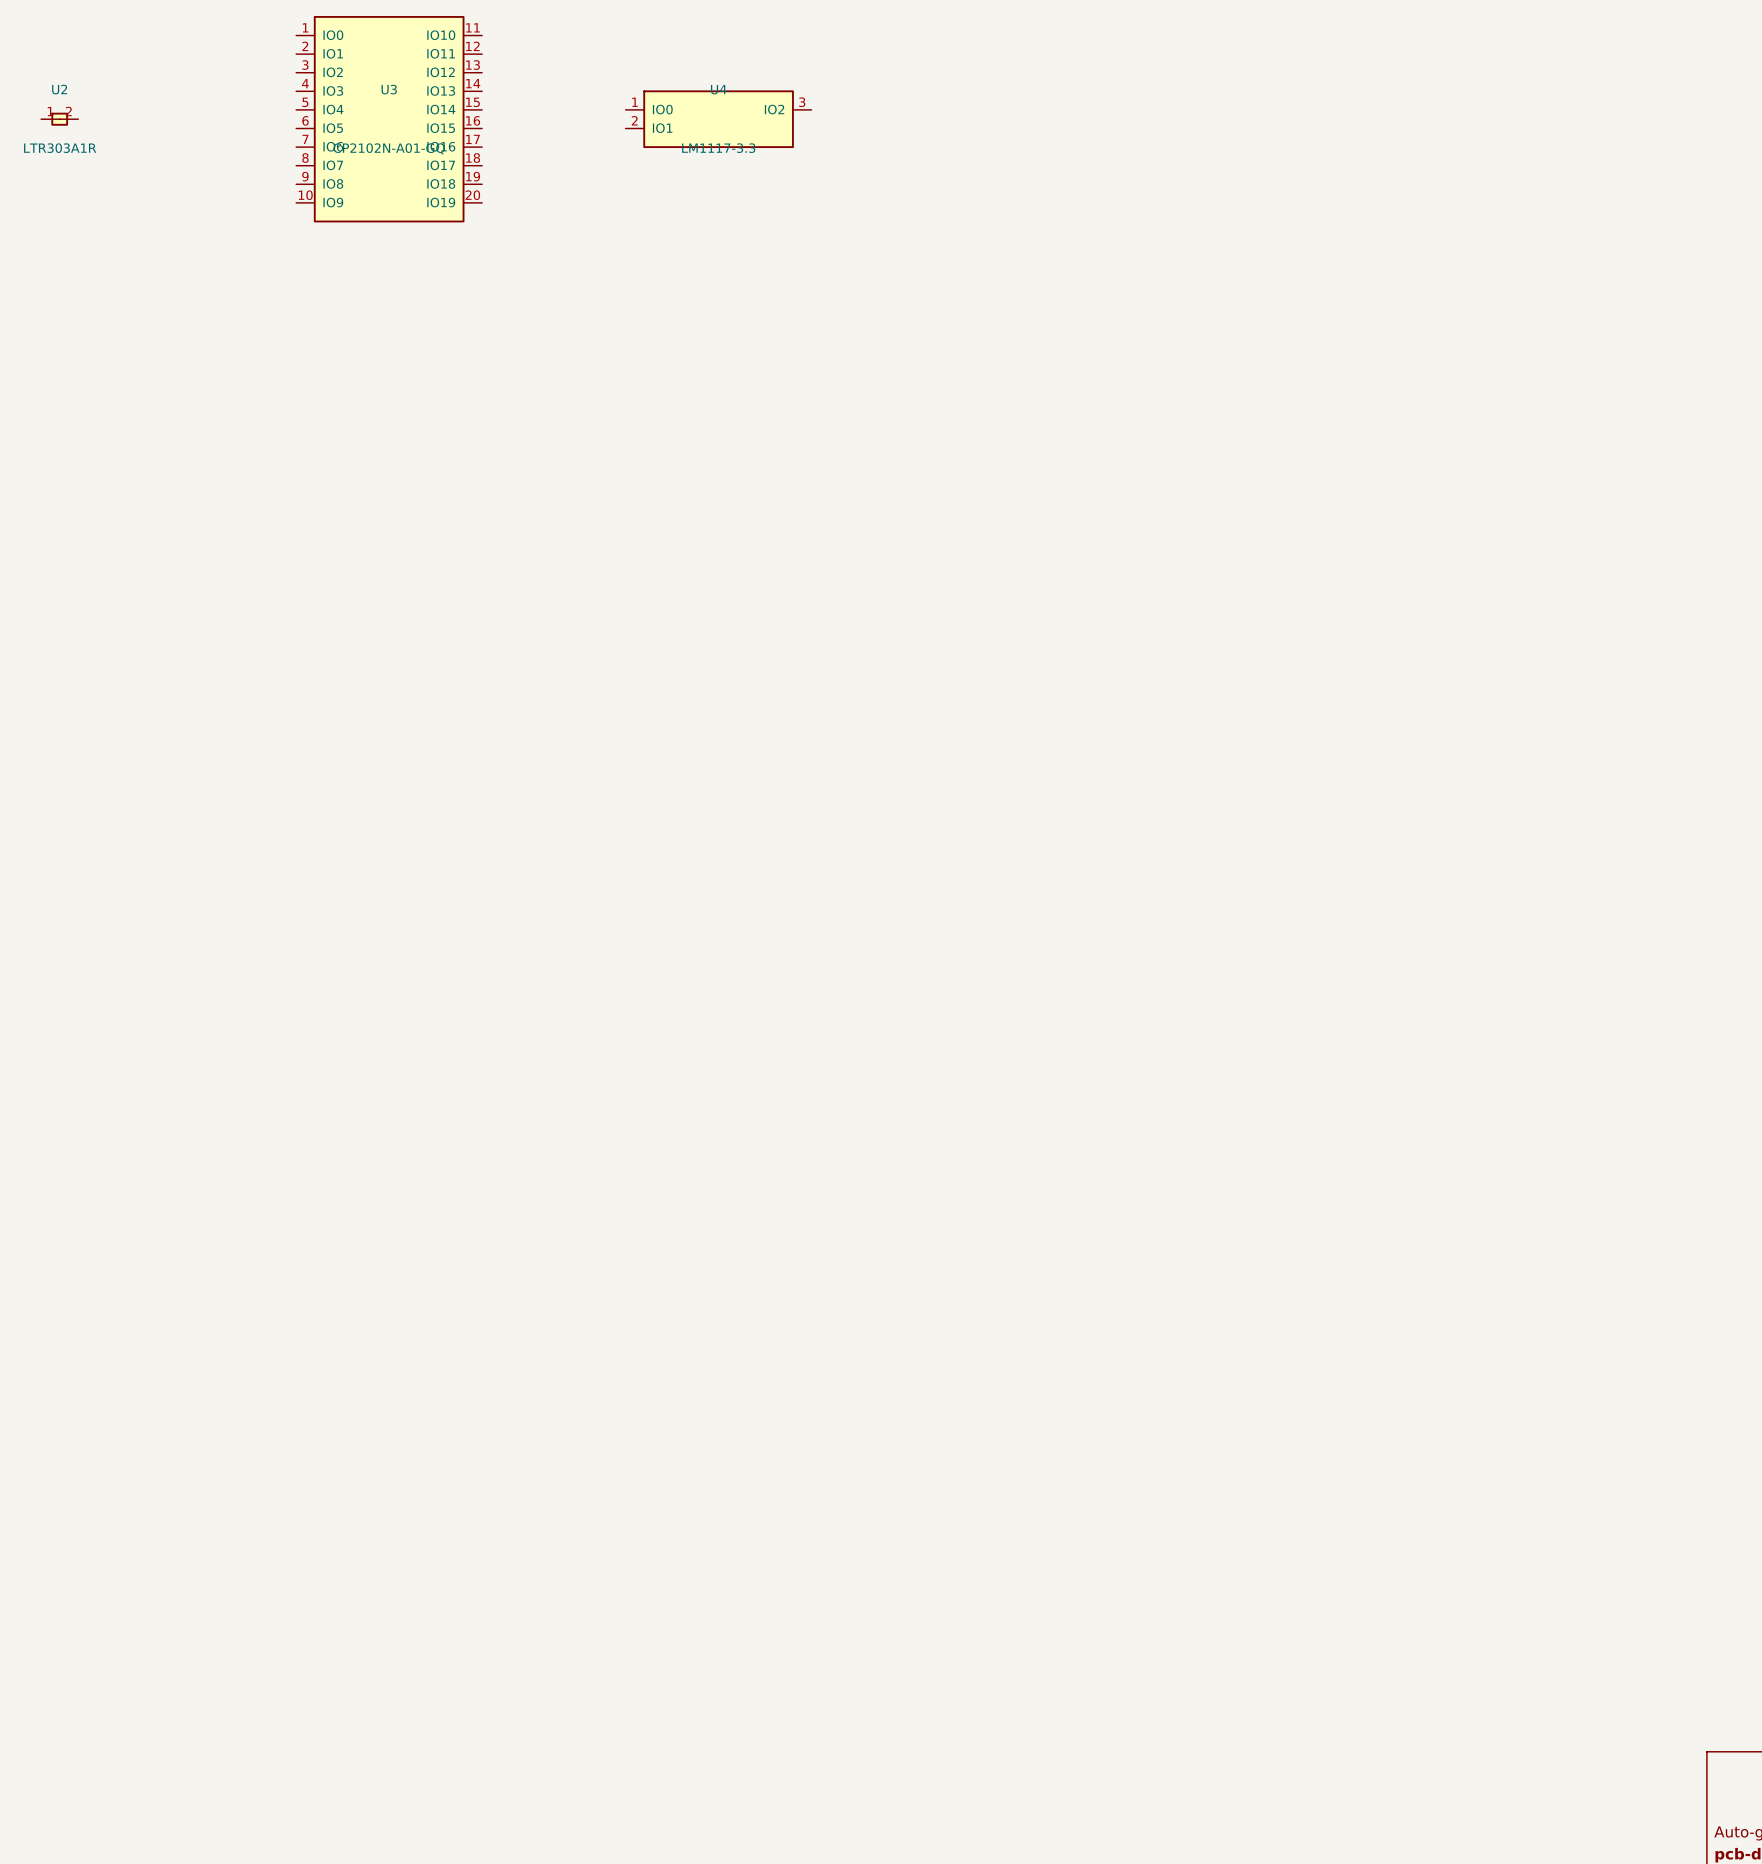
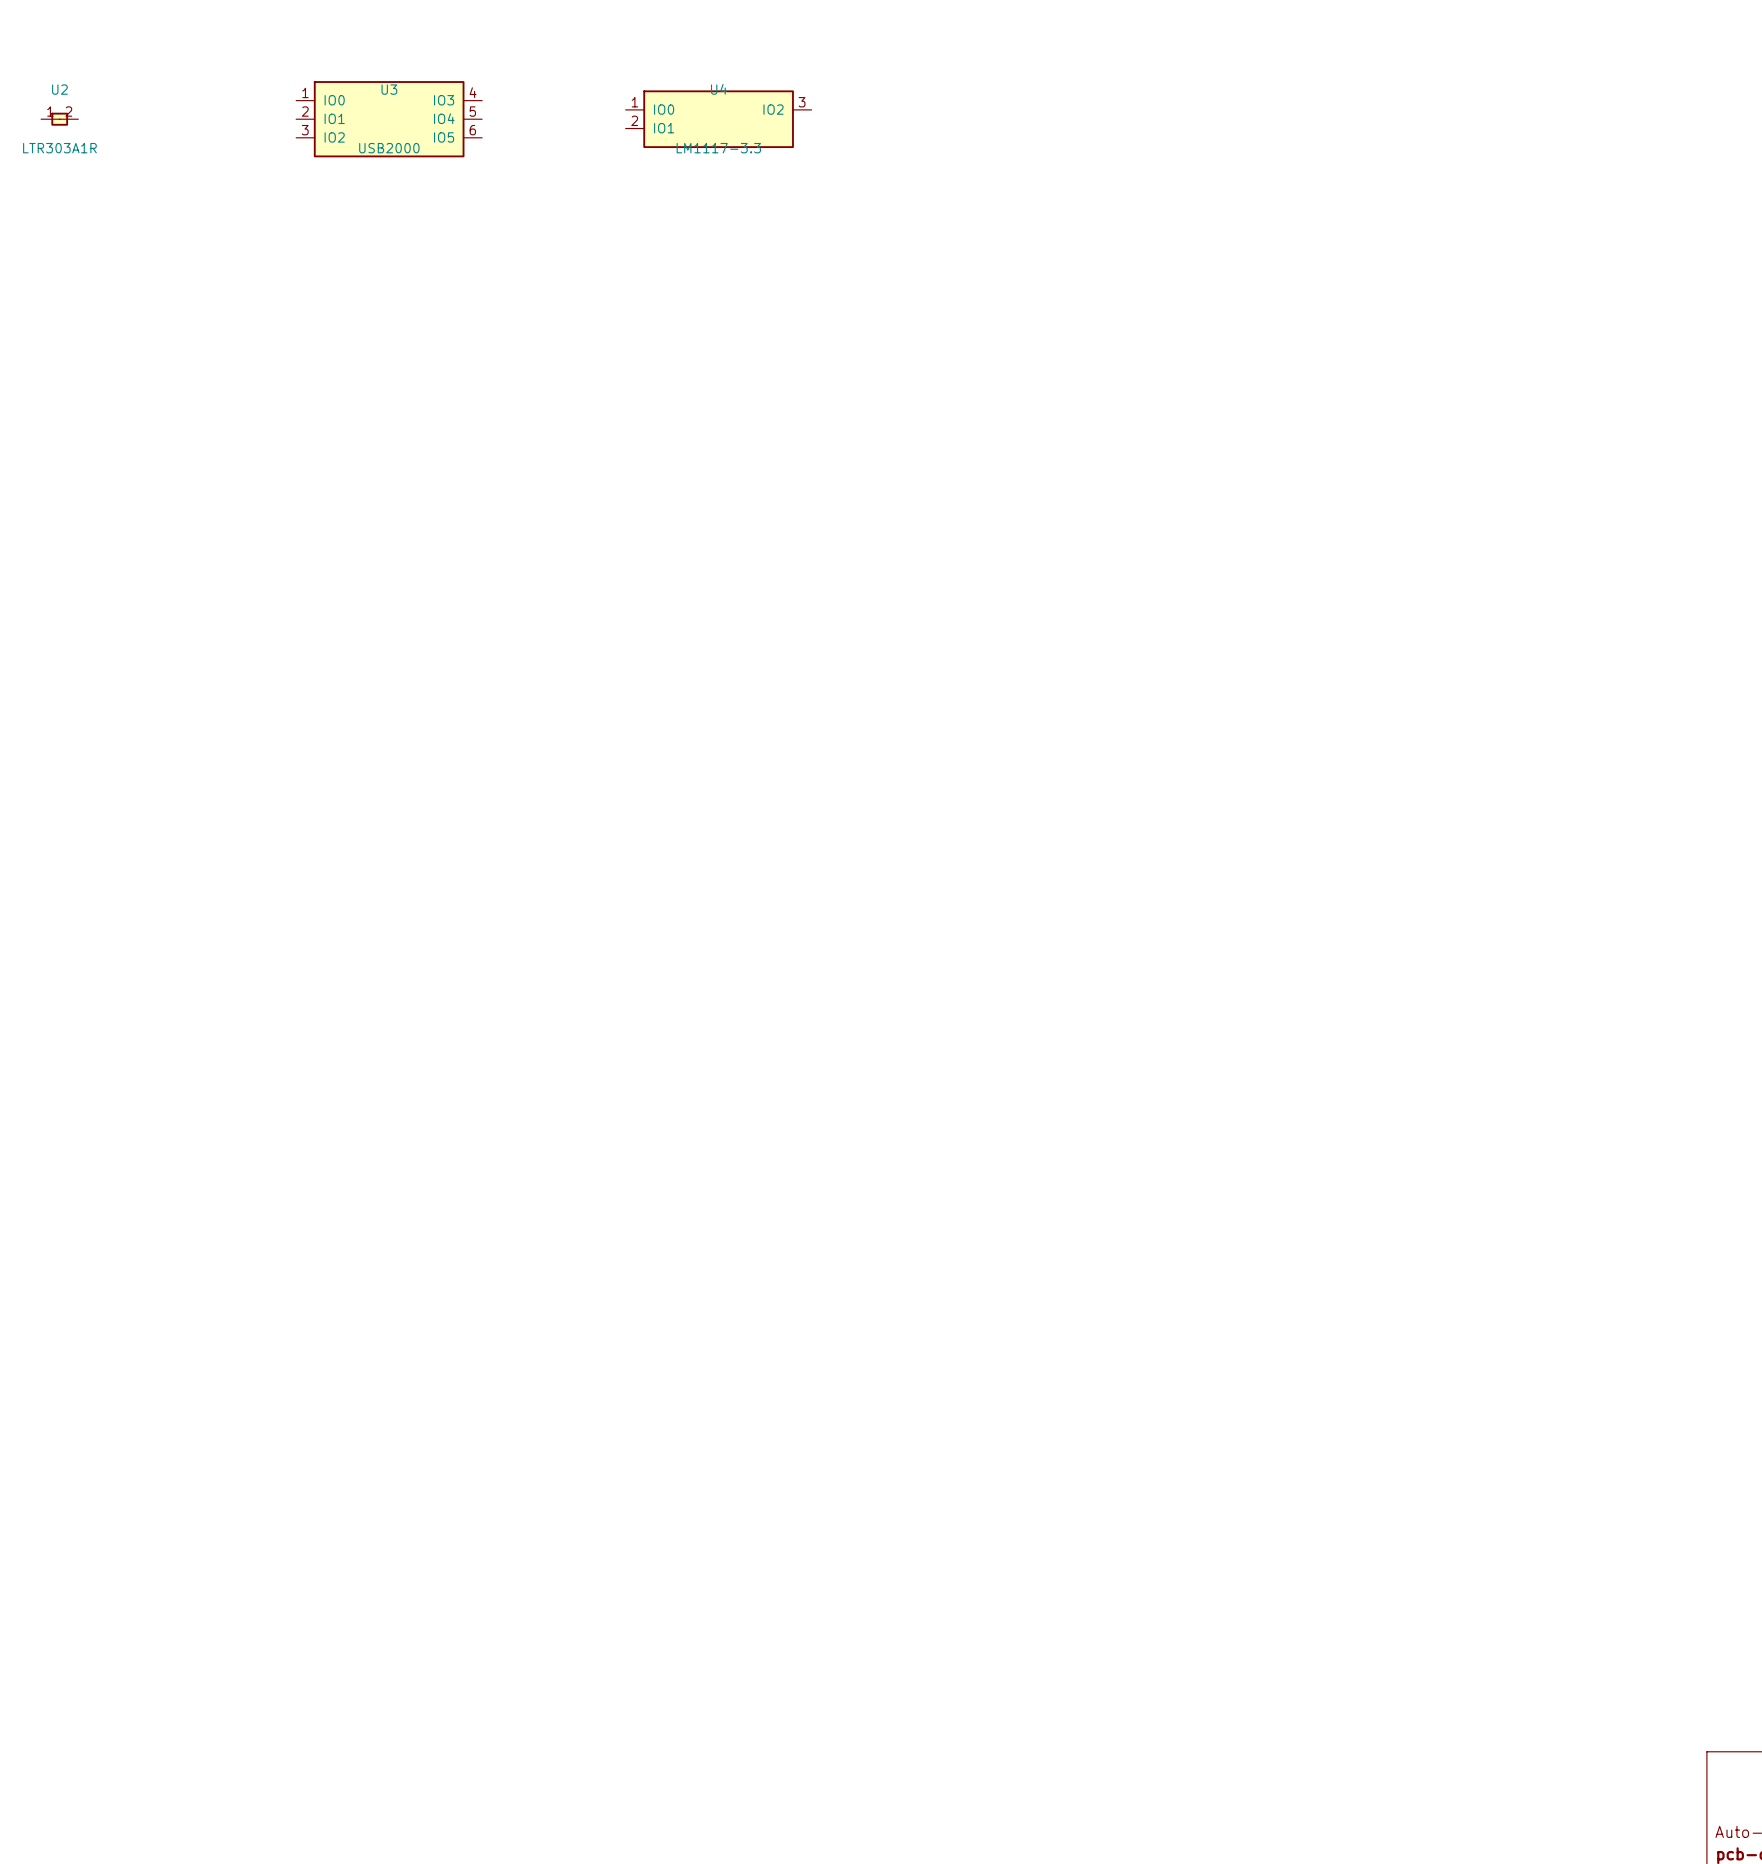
U3 symbol: [296, 16, 483, 223] -> [296, 81, 483, 158]
U3 value: CP2102N-A01-GQ (389, 148) -> USB2000 (389, 148)

